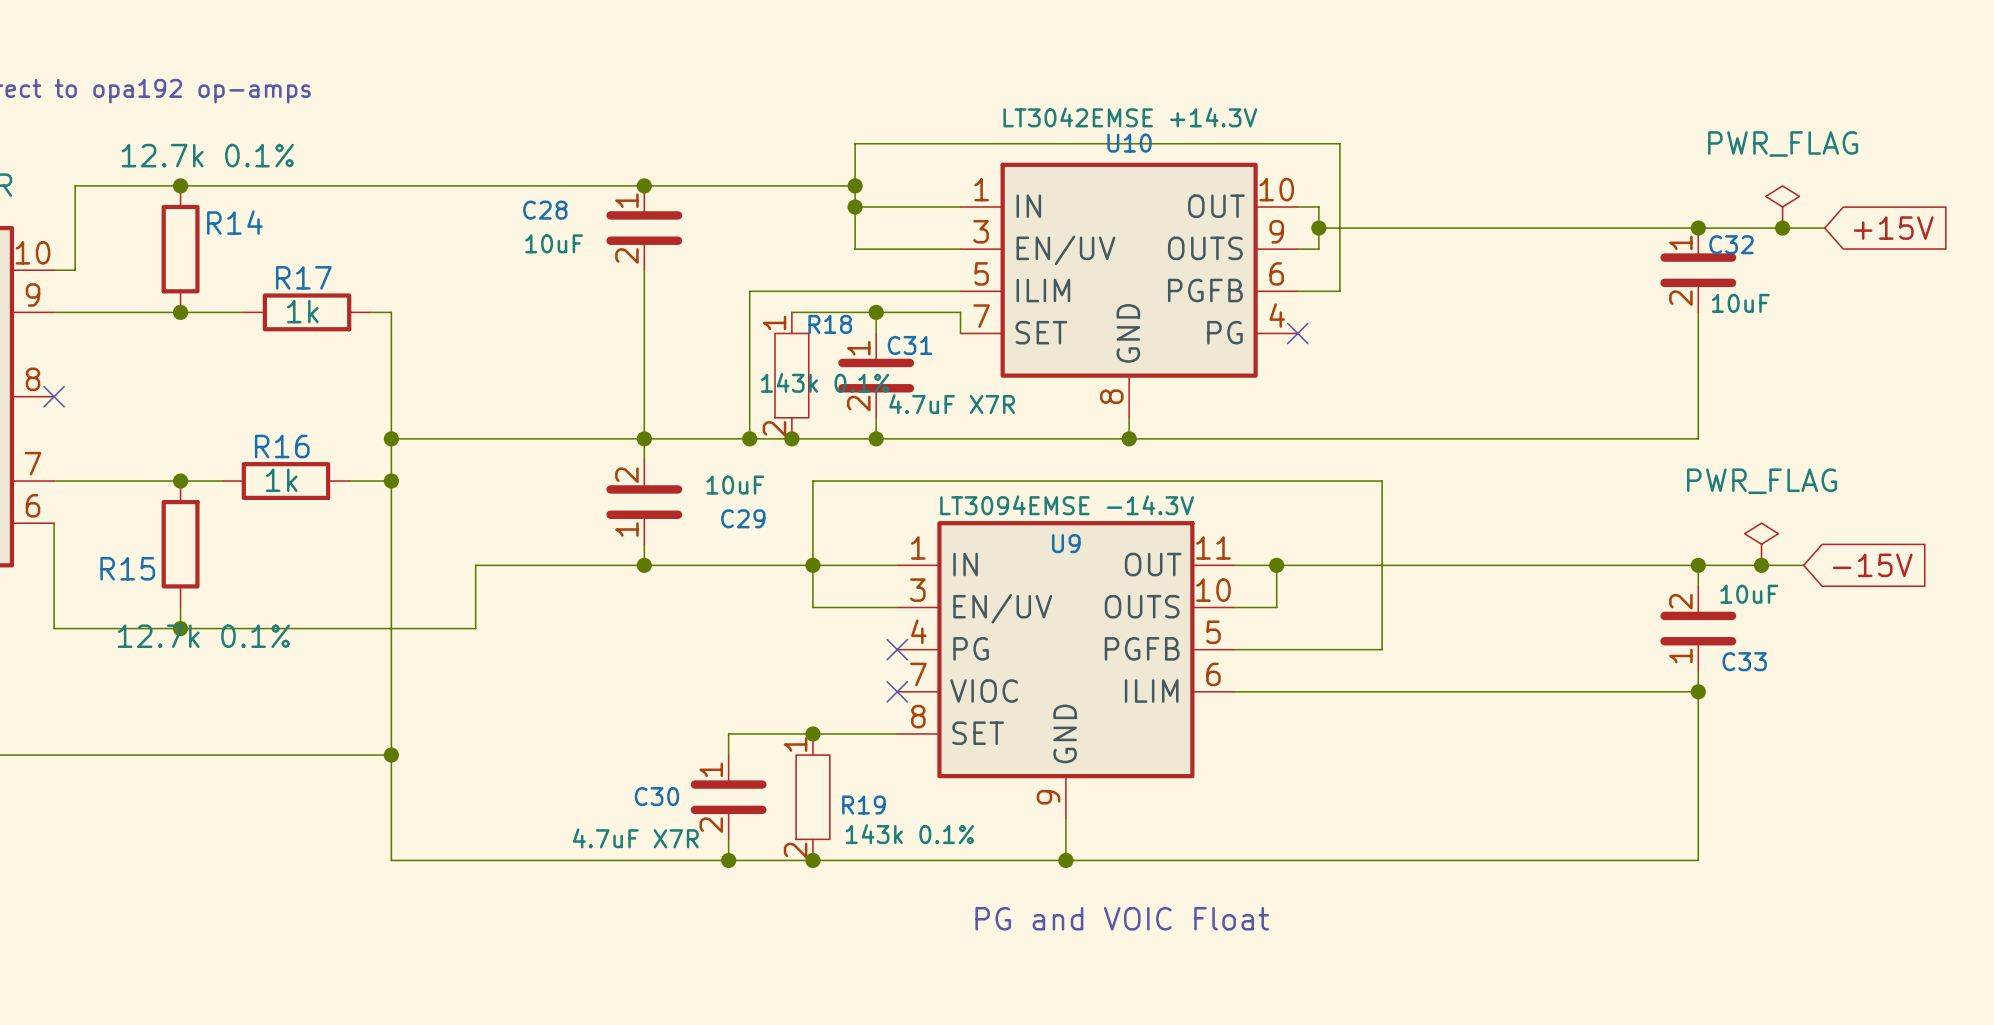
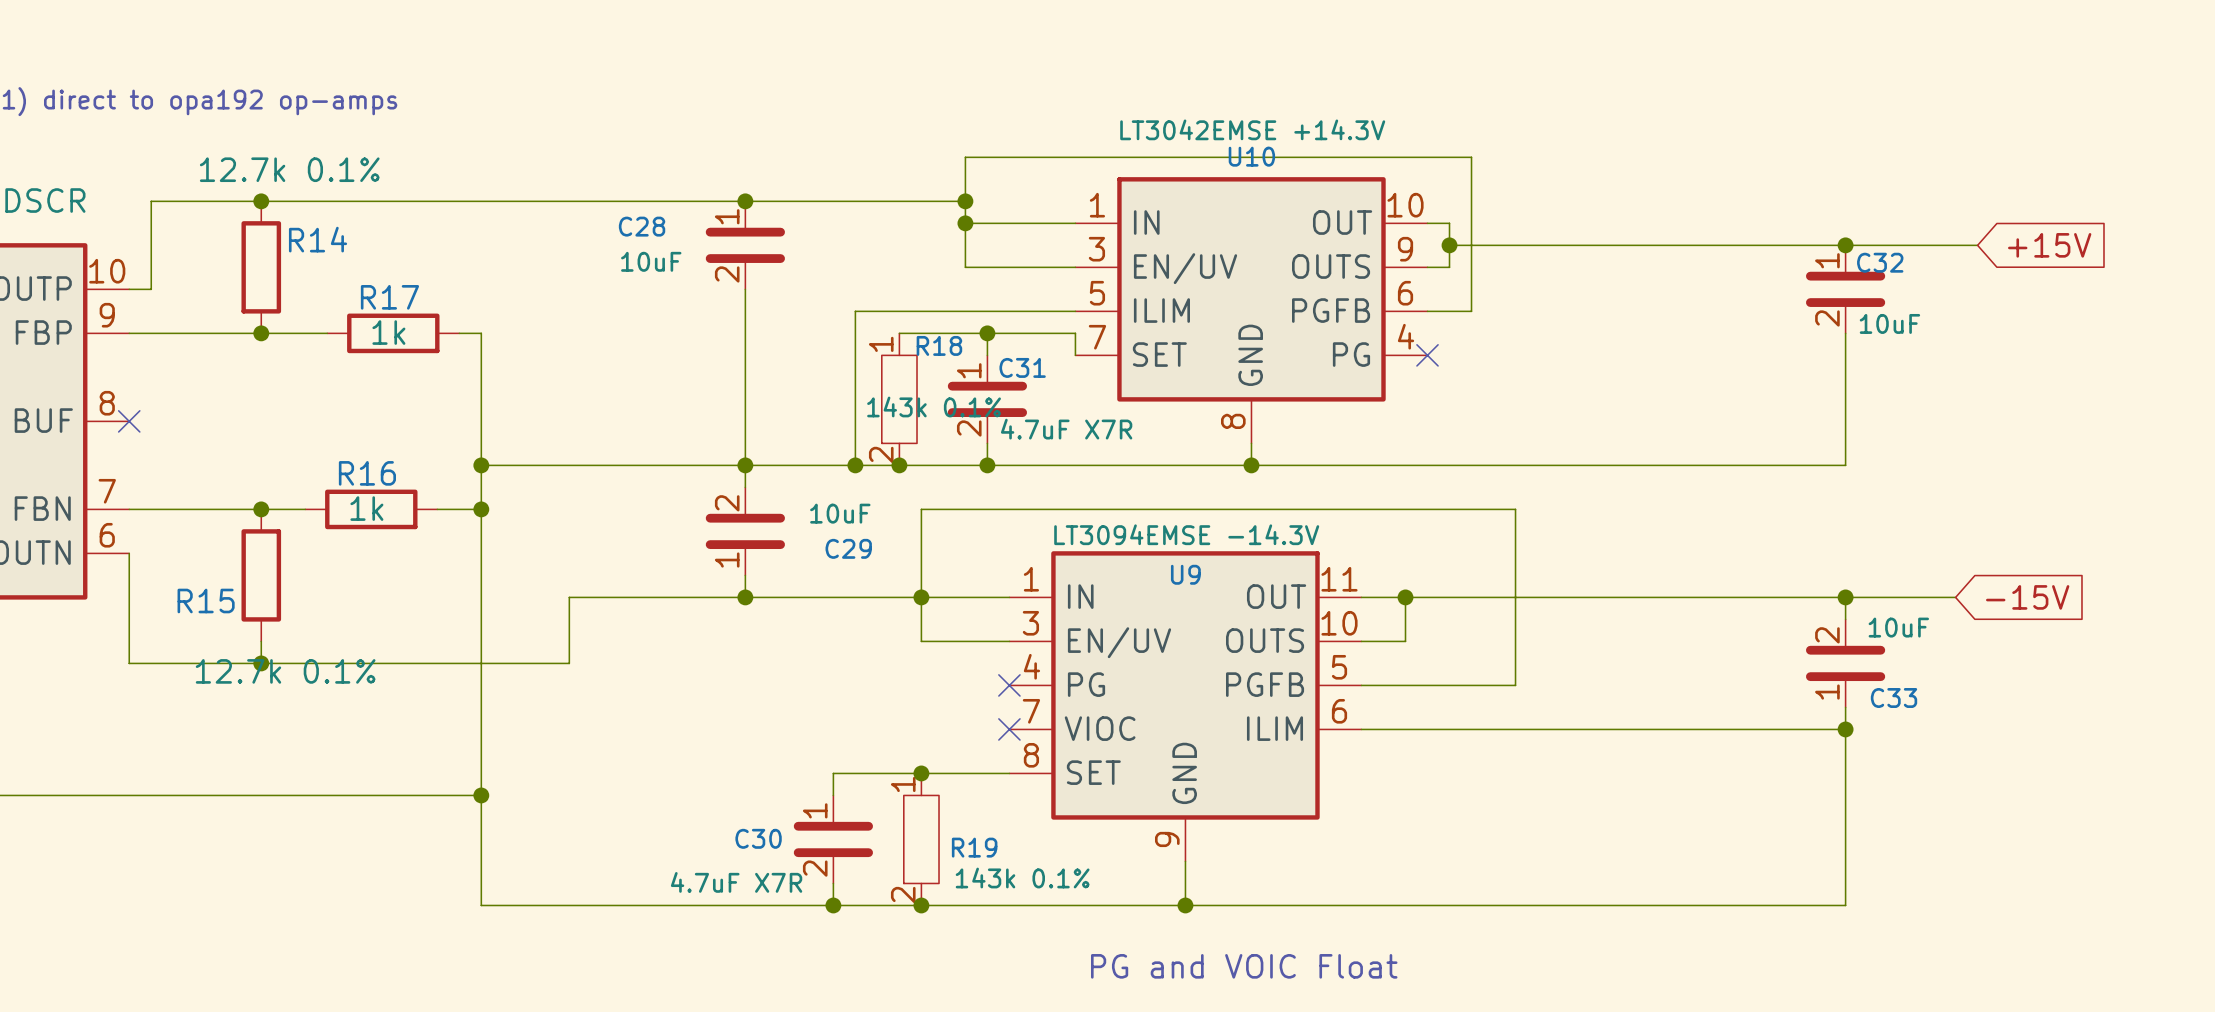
power symbol: PWR_FLAG (1782, 206) -> none
junction: (1782, 228) -> none
power symbol: PWR_FLAG (1761, 544) -> none
junction: (1761, 565) -> none

